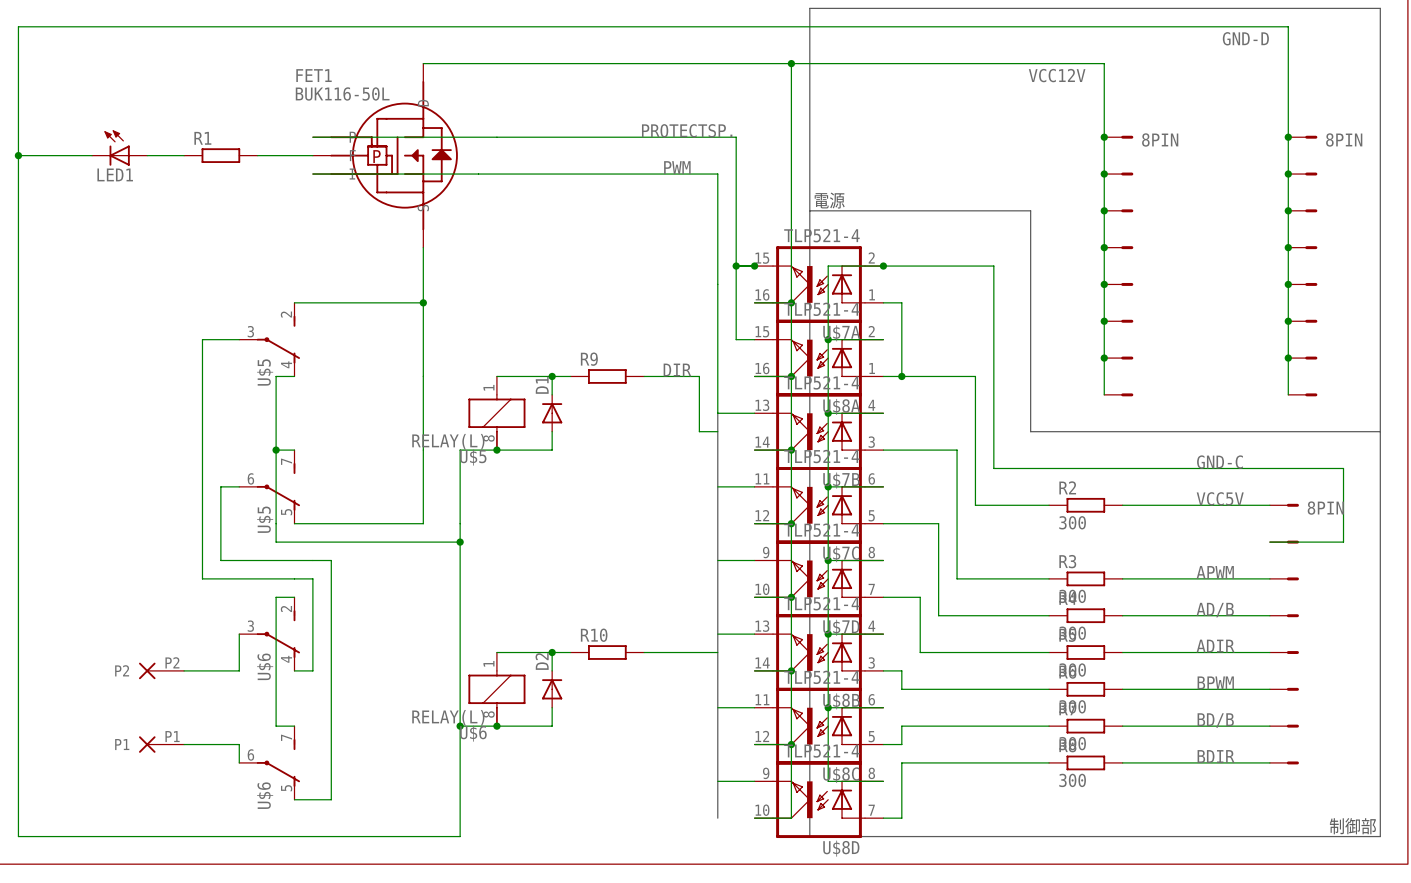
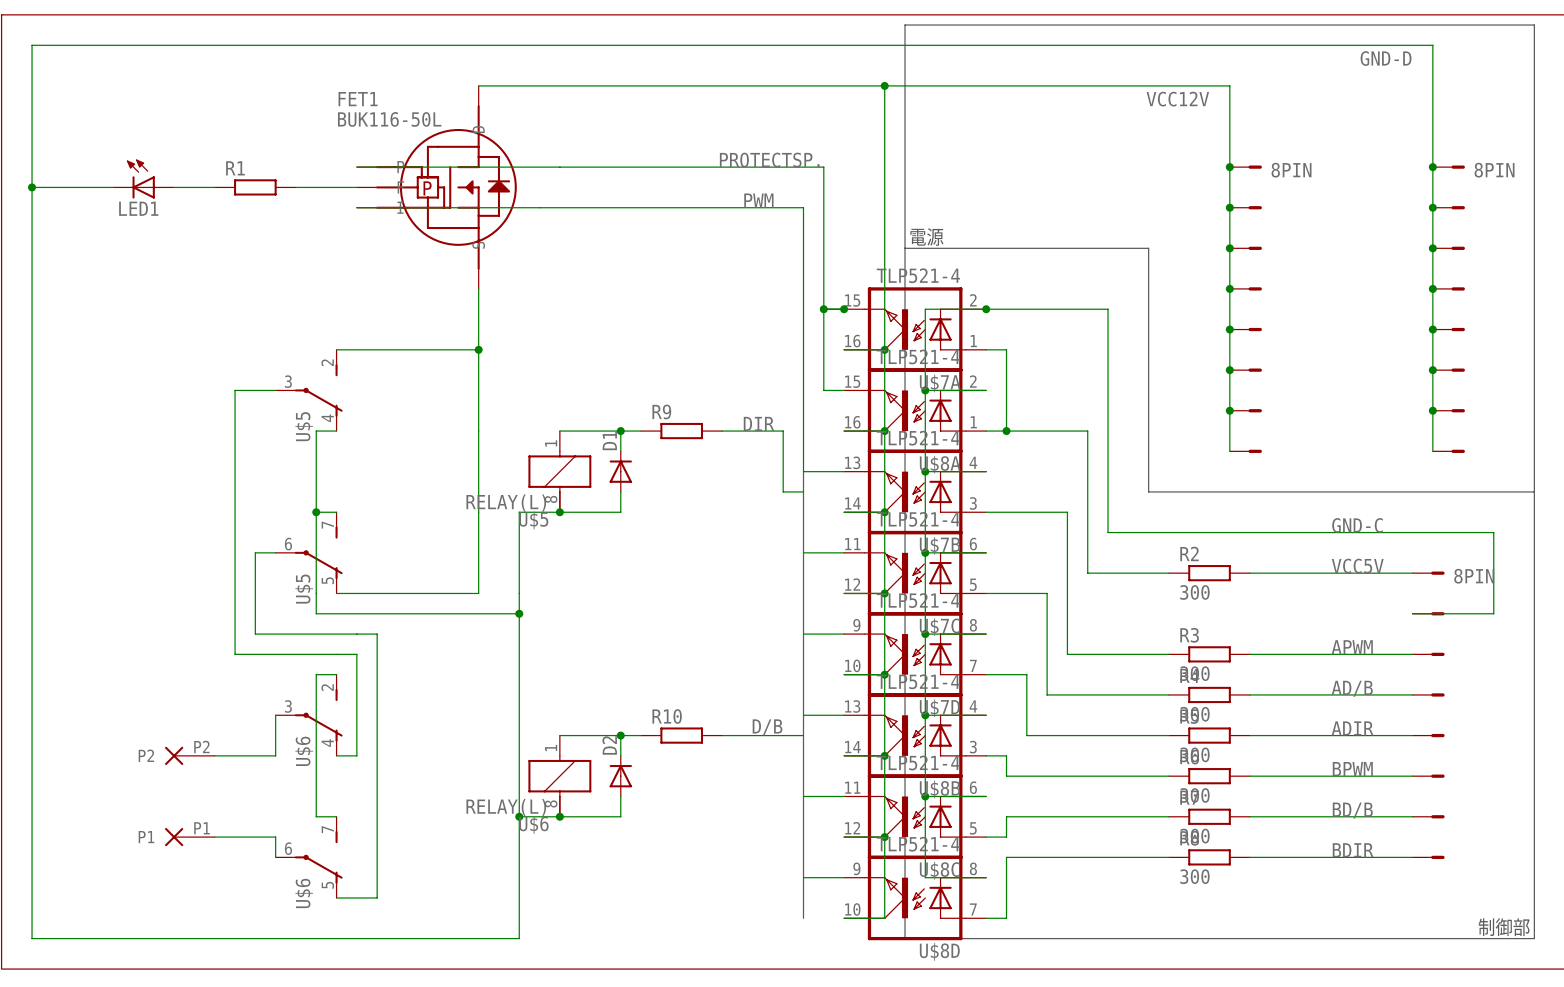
label: none -> D/B (767, 727)

